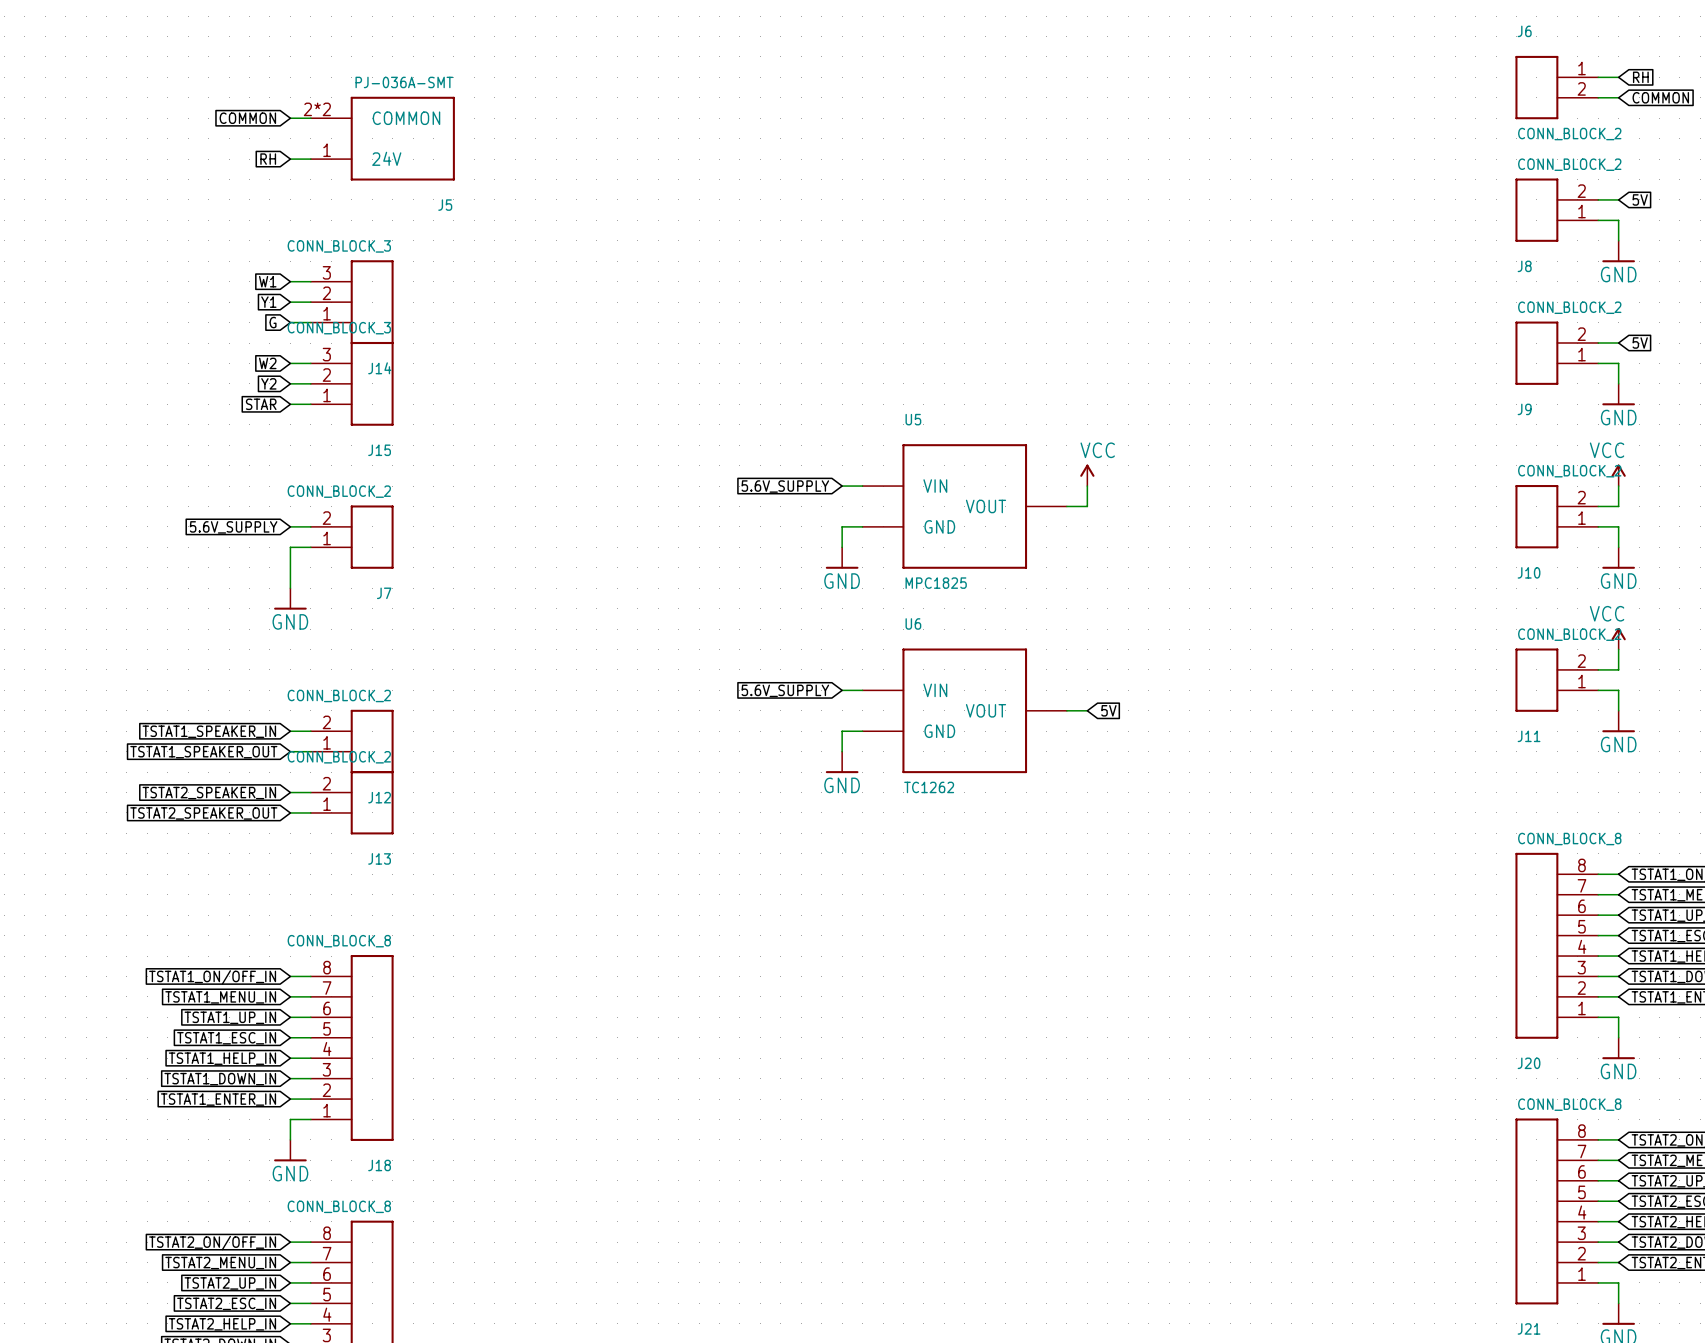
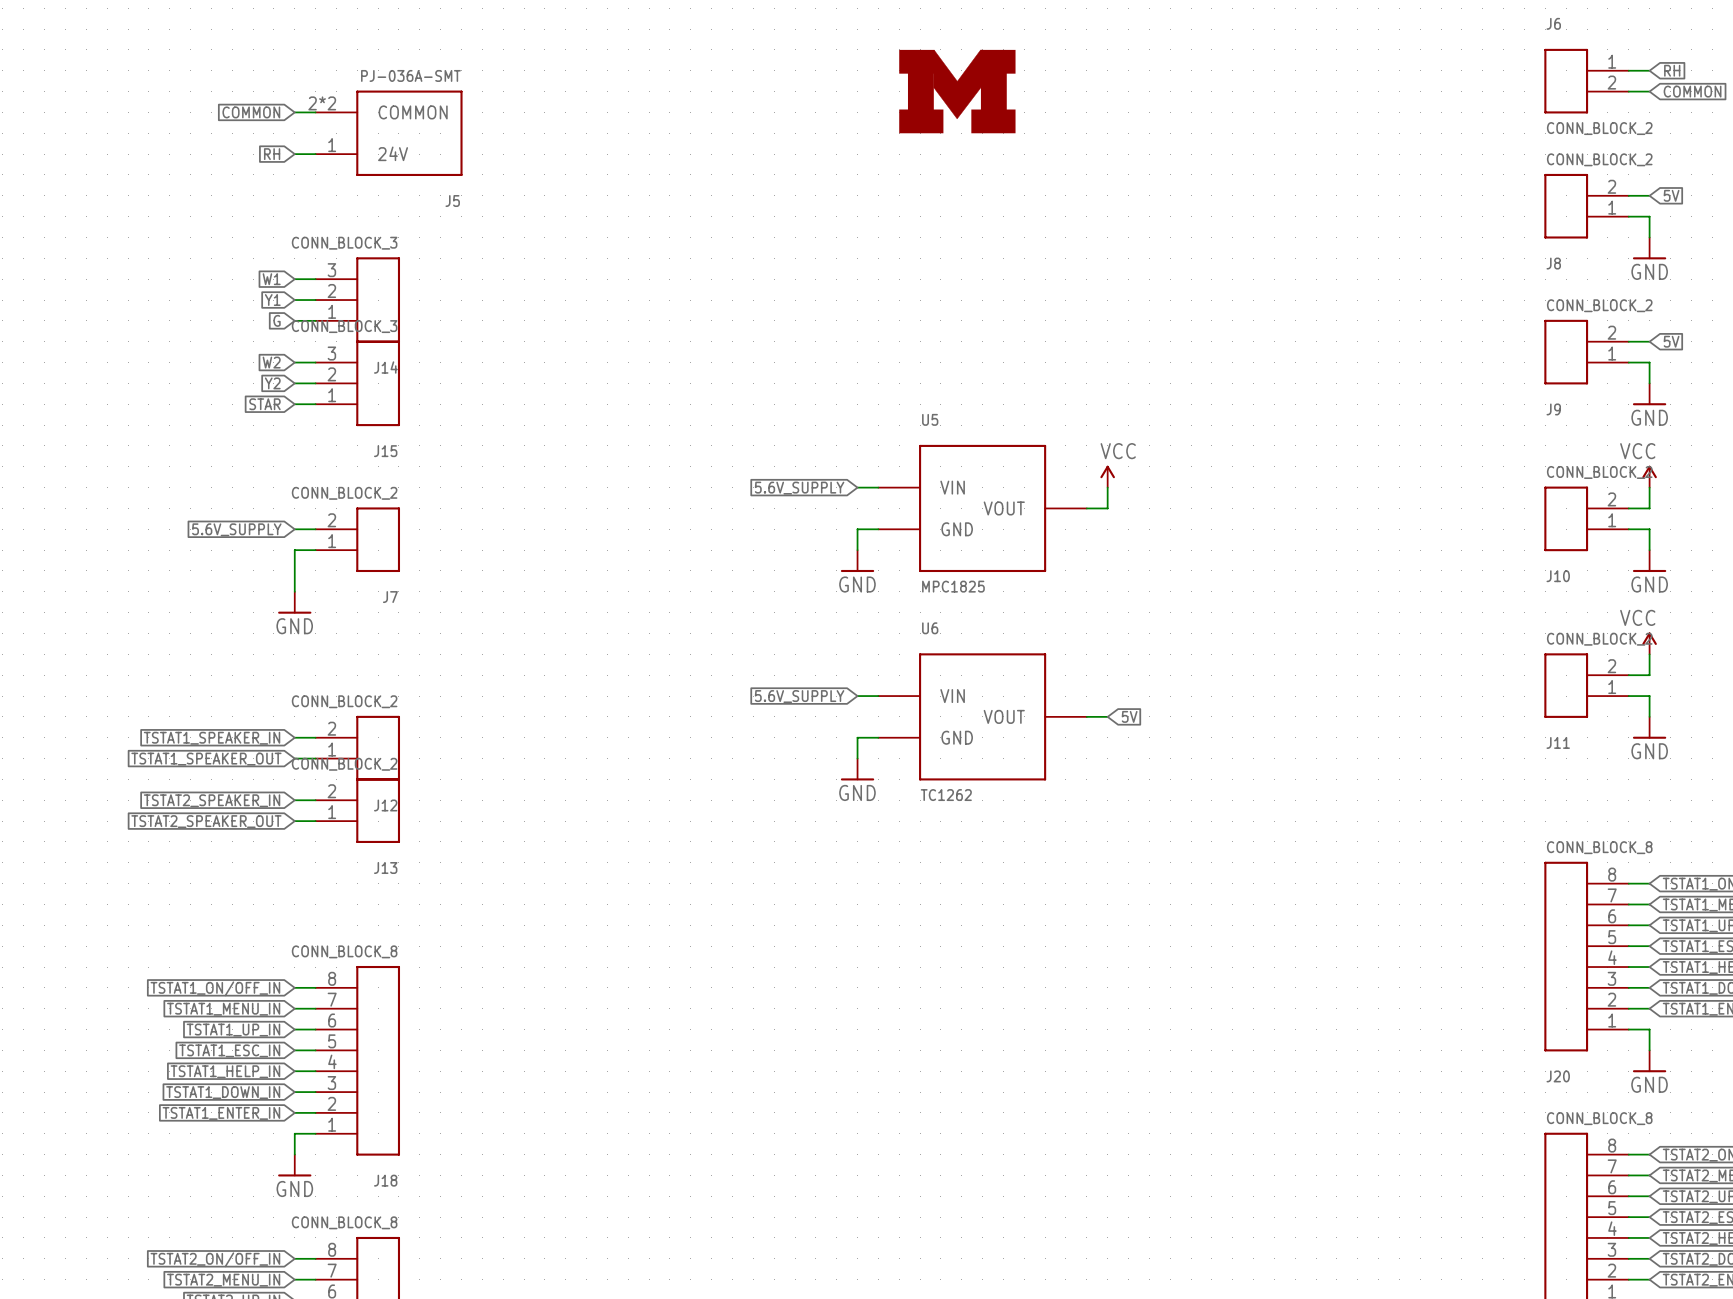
part: none -> (957, 91)

